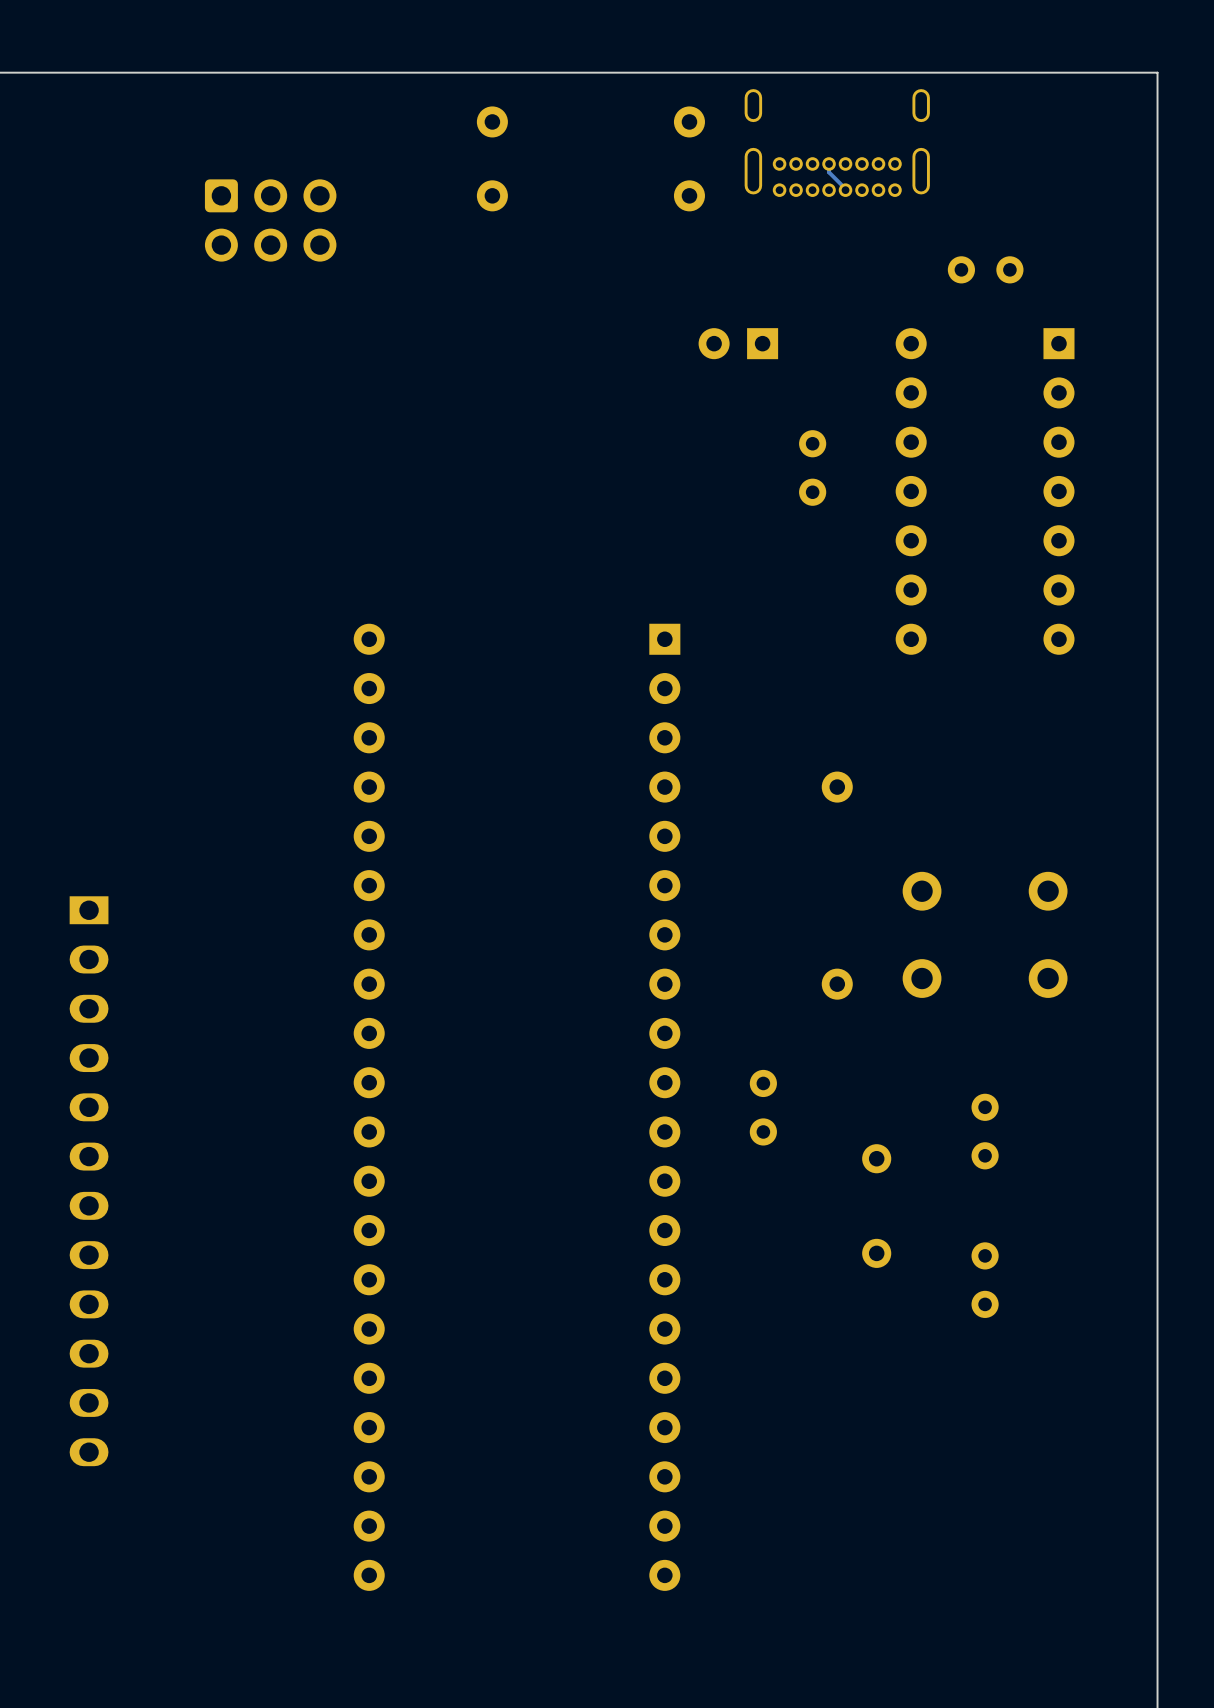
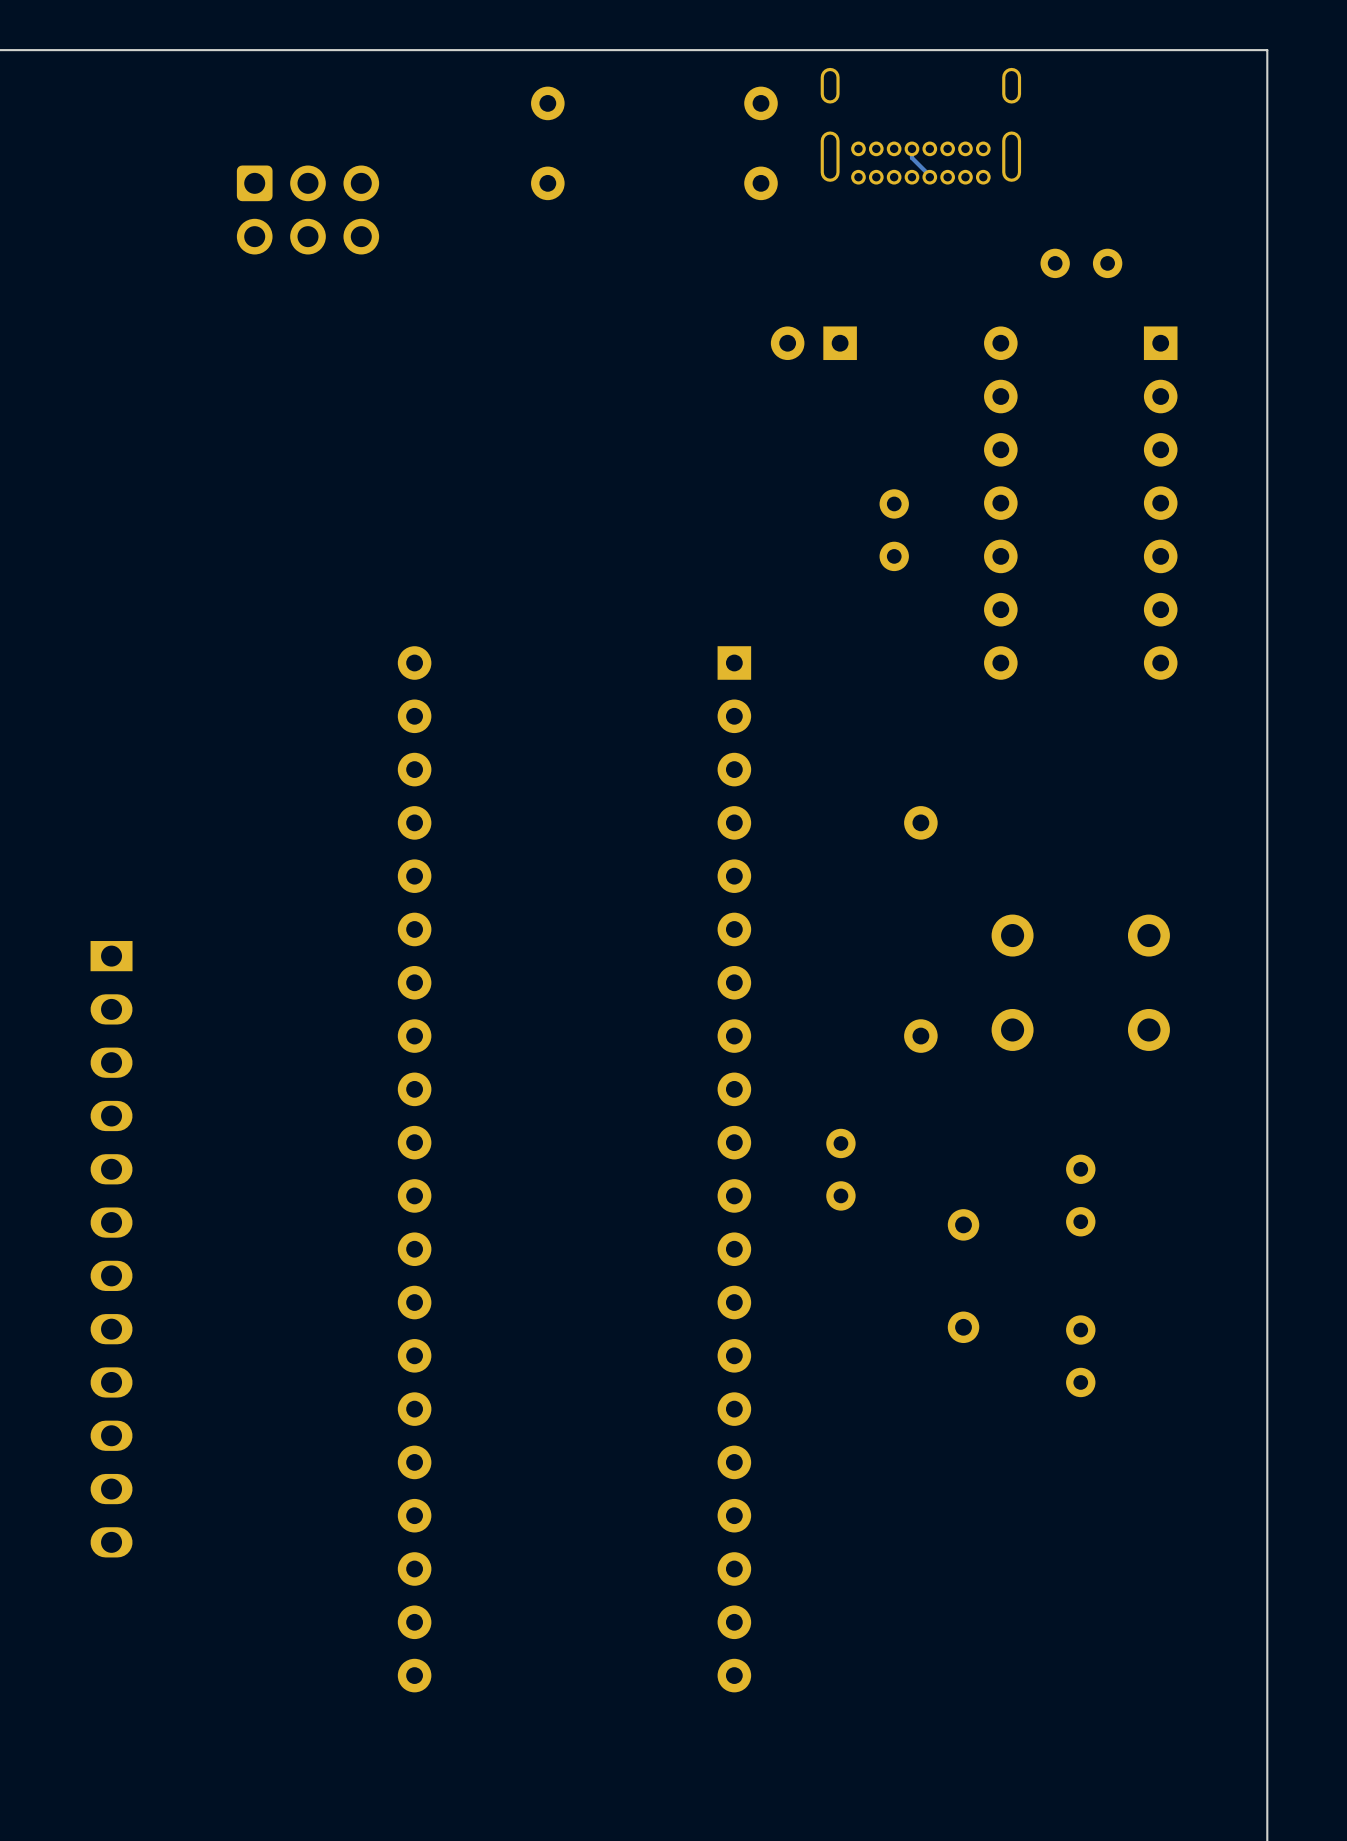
part position: (812, 467) -> (894, 530)

